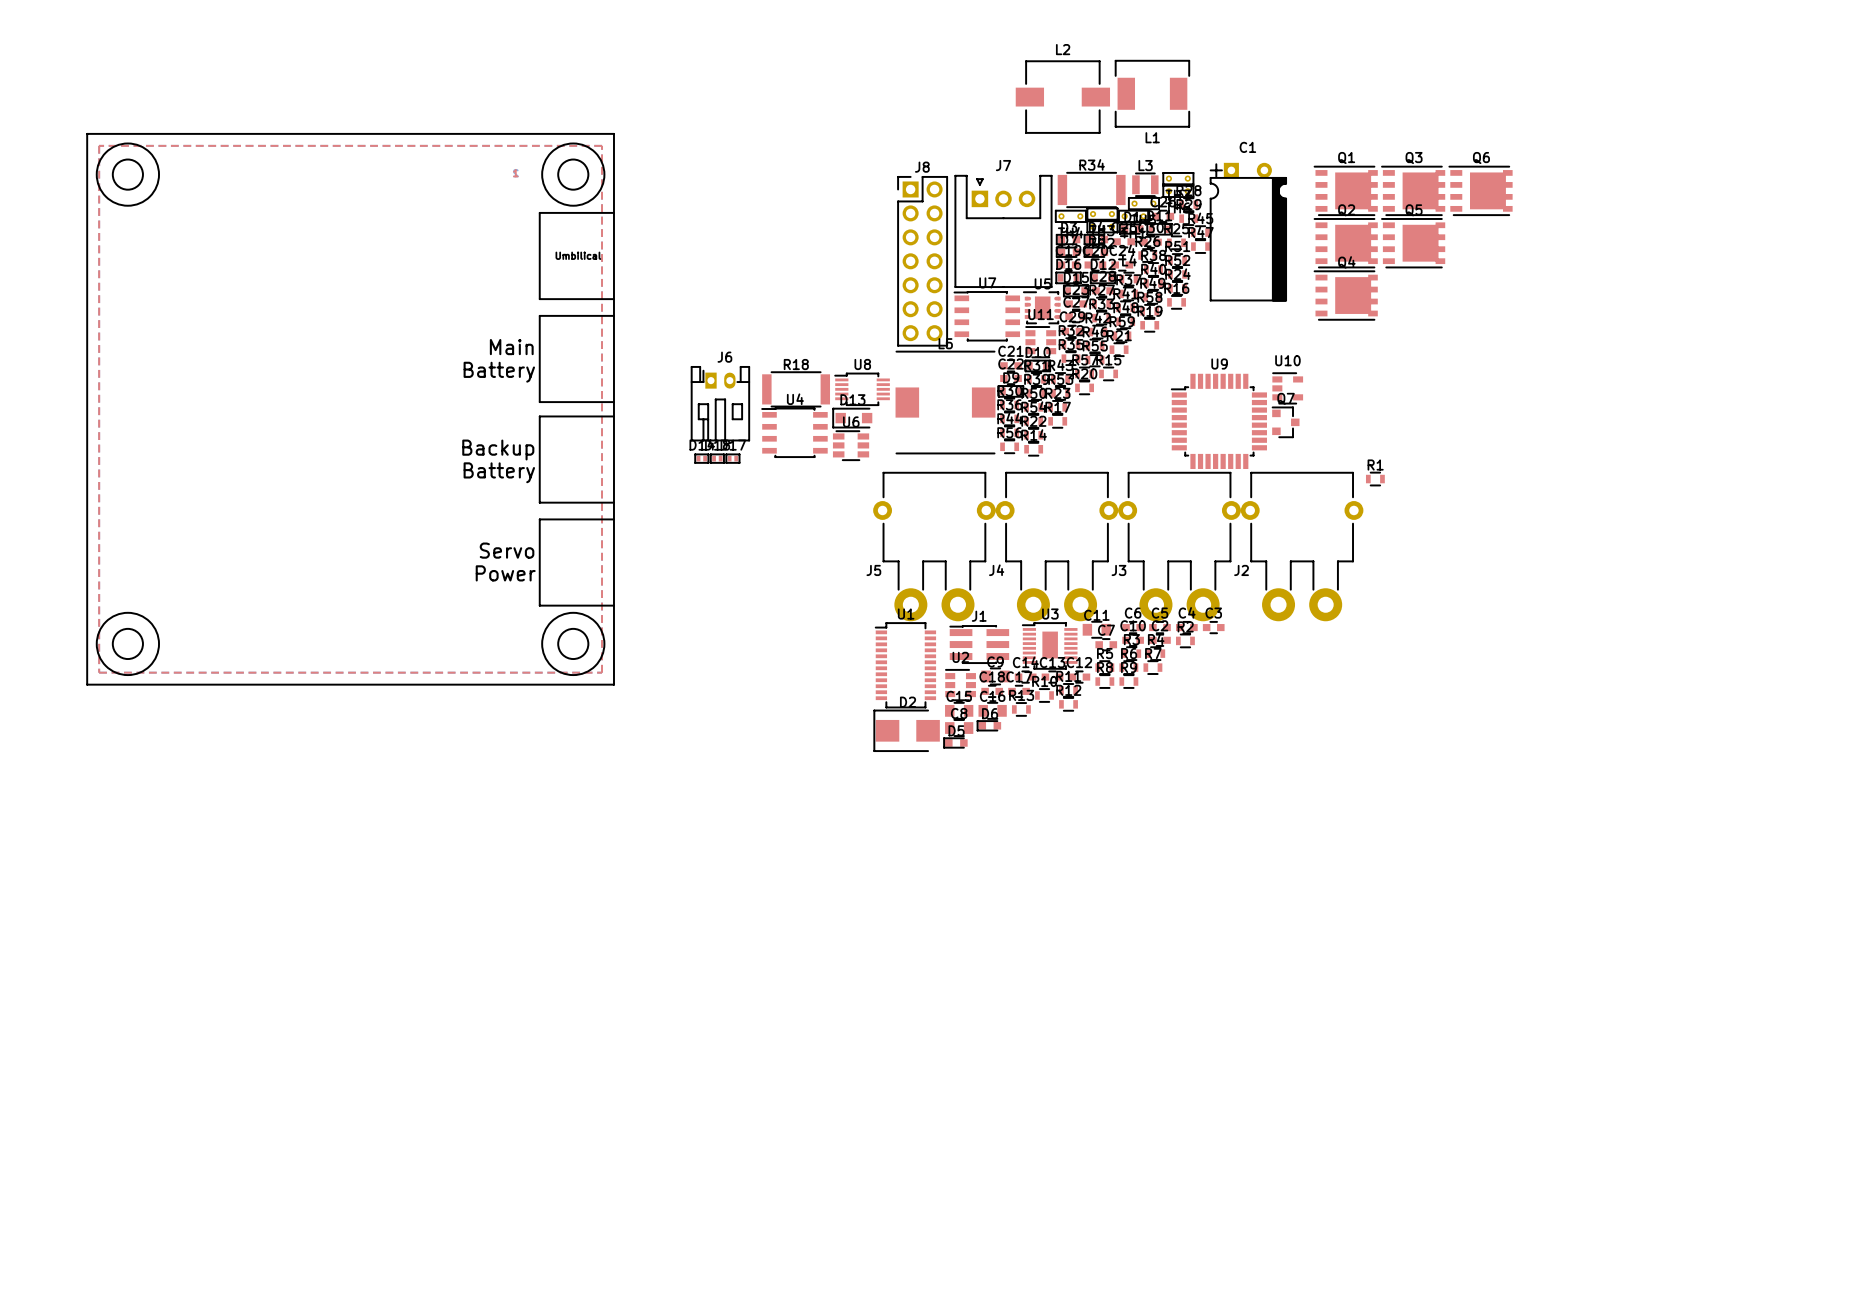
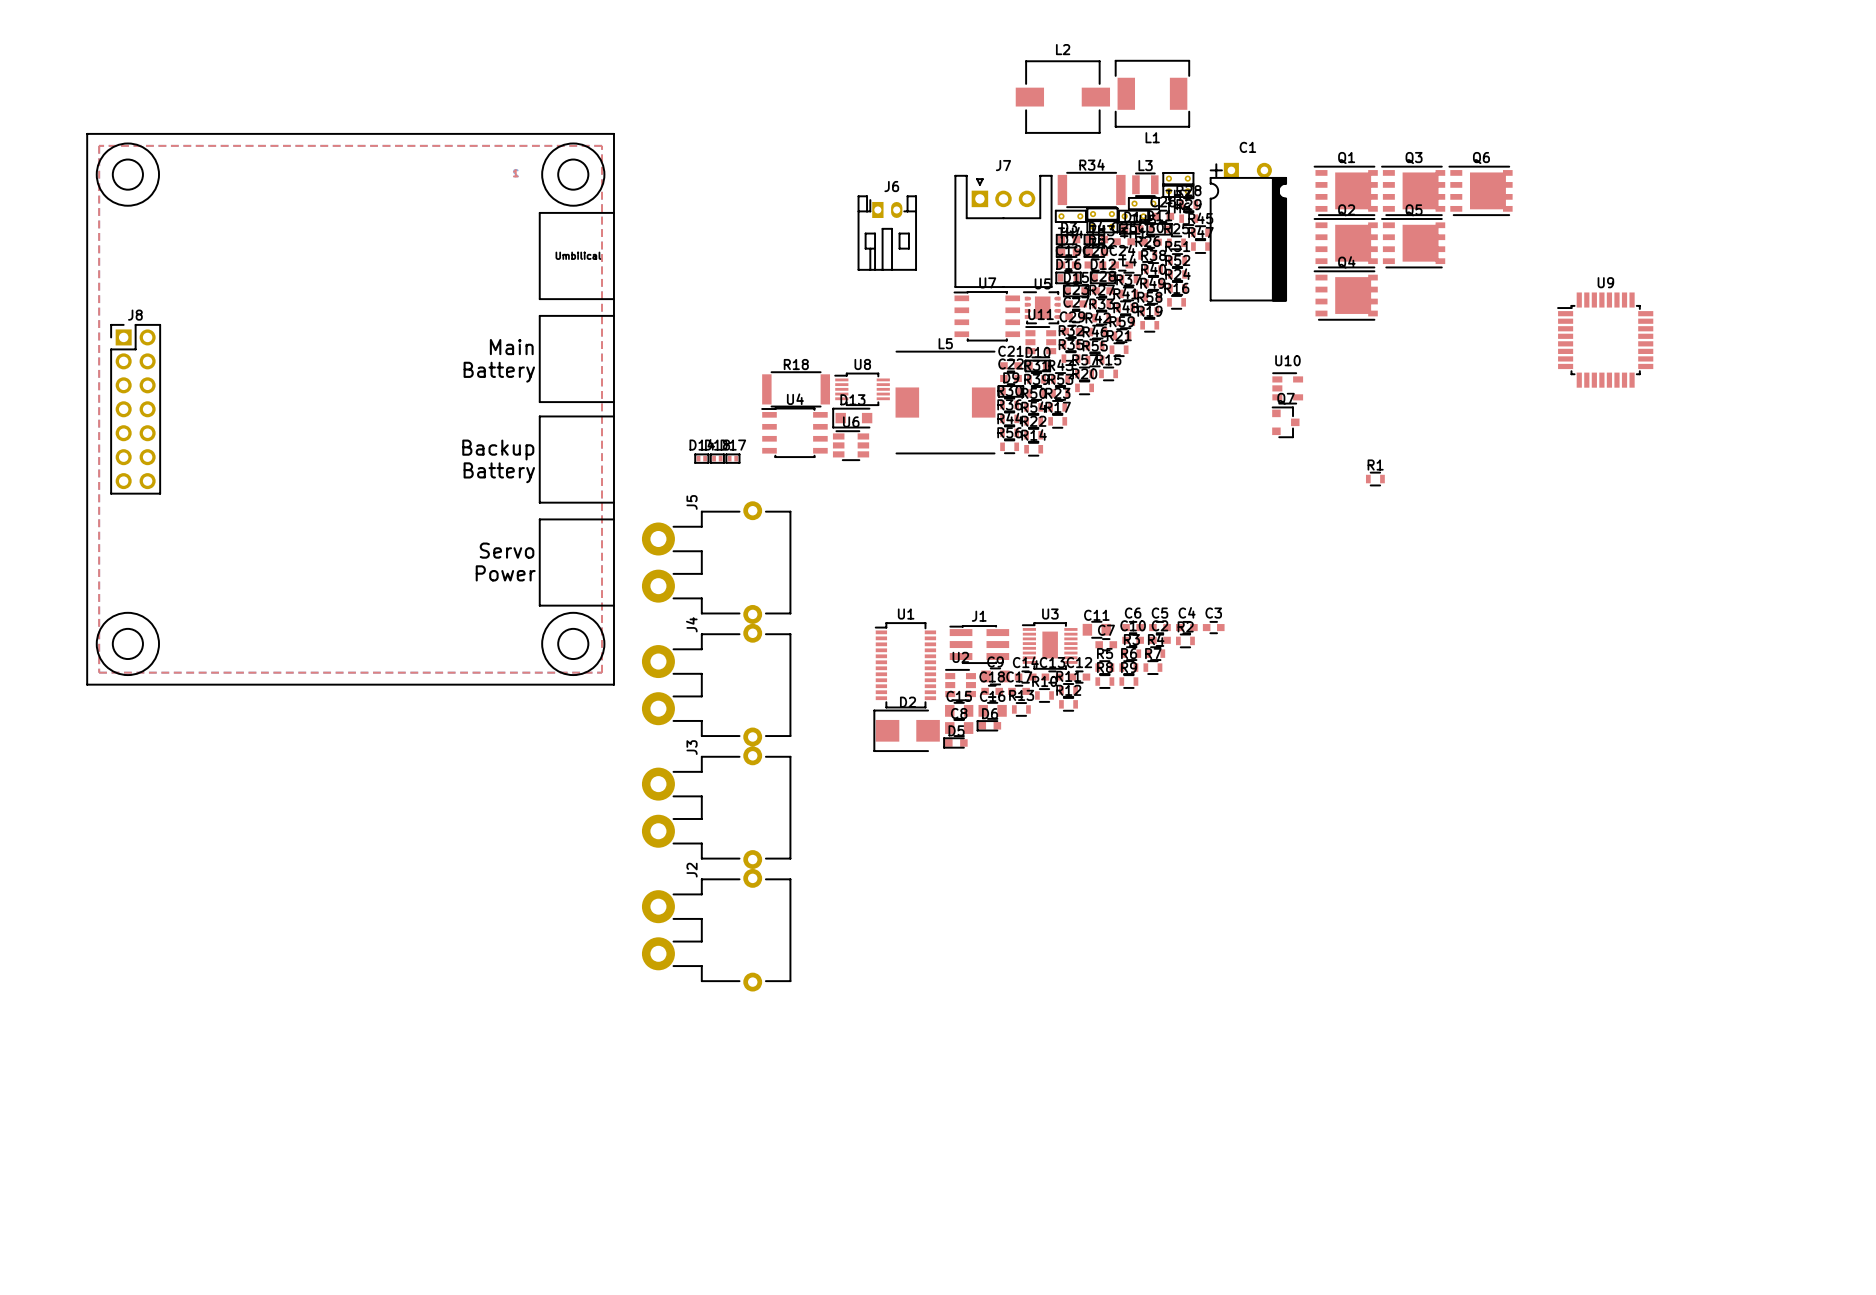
J8 position: (922, 261) -> (135, 409)
J6 position: (720, 403) -> (887, 233)
U9 position: (1219, 421) -> (1605, 340)
J5 rotation: 0° (934, 546) -> 90° clockwise (716, 562)
J5 position: (934, 546) -> (716, 562)
J4 rotation: 0° (1056, 546) -> 90° clockwise (716, 685)
J4 position: (1056, 546) -> (716, 685)
J3 rotation: 0° (1179, 546) -> 90° clockwise (716, 807)
J3 position: (1179, 546) -> (716, 807)
J2 rotation: 0° (1302, 546) -> 90° clockwise (716, 930)
J2 position: (1302, 546) -> (716, 930)

